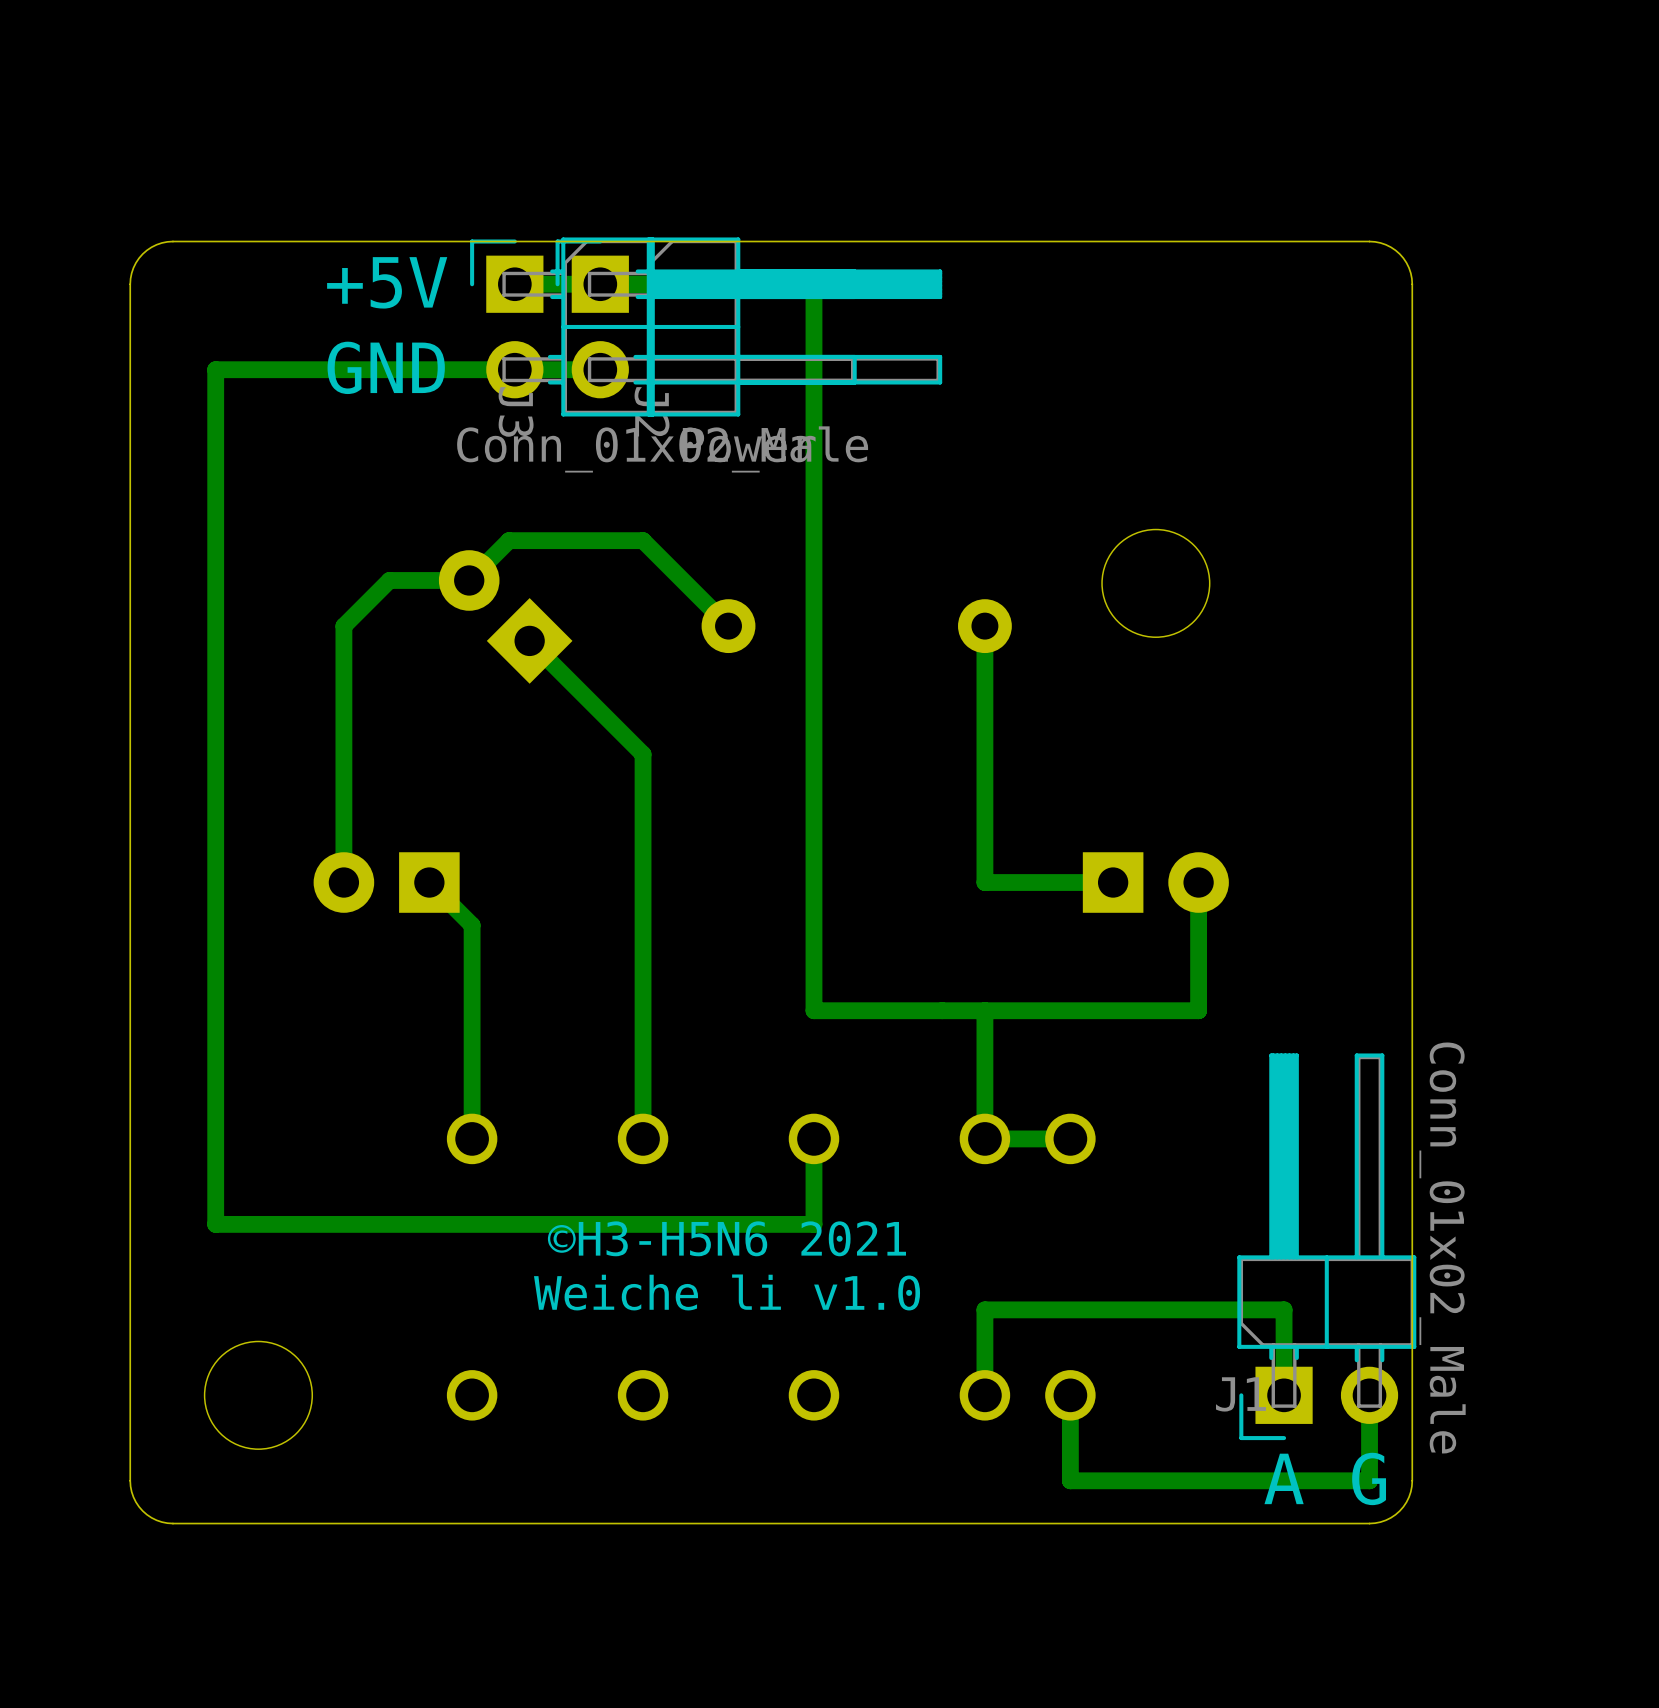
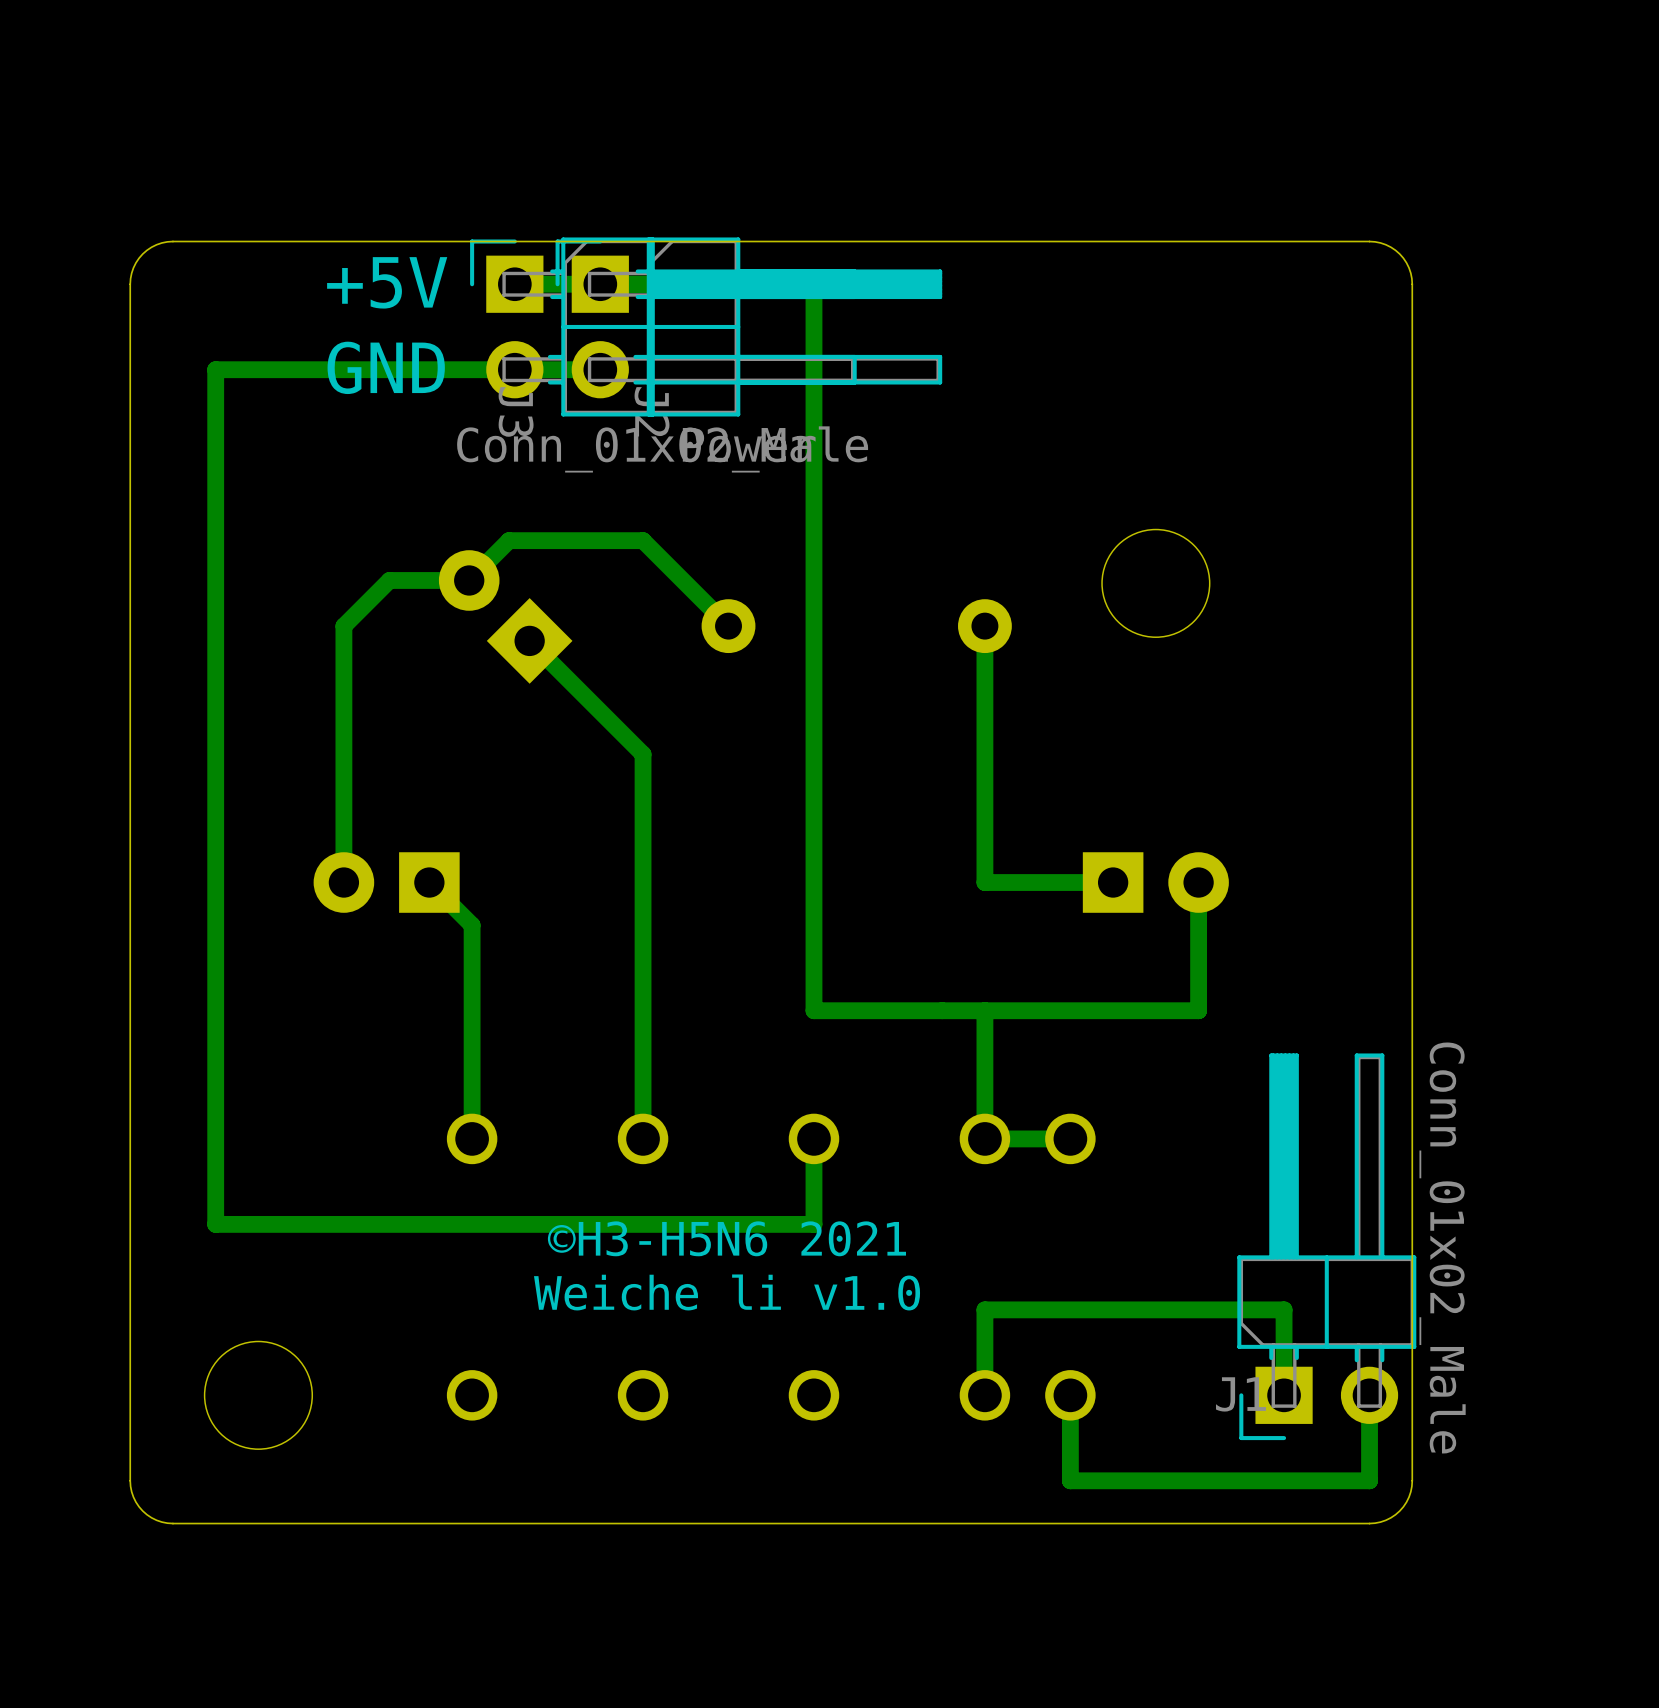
text: A (1284, 1478) -> none
text: G (1369, 1478) -> none

